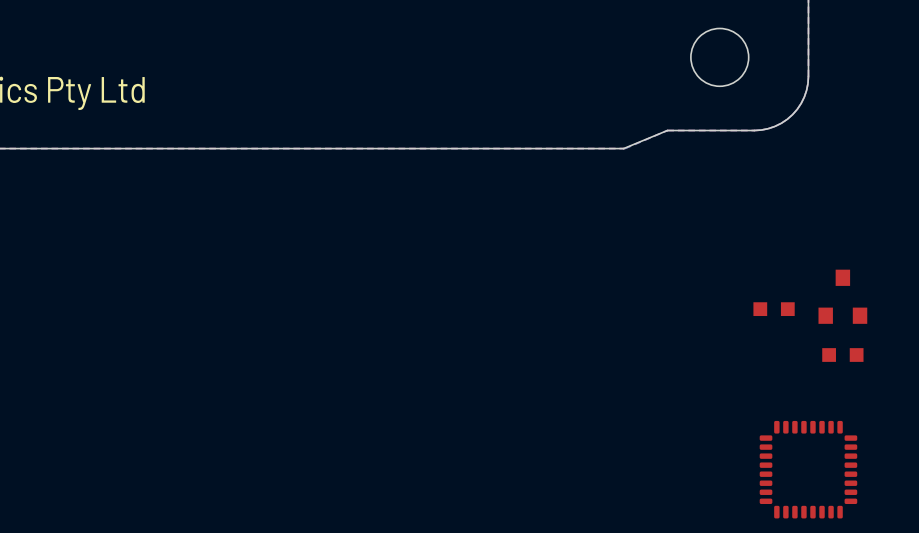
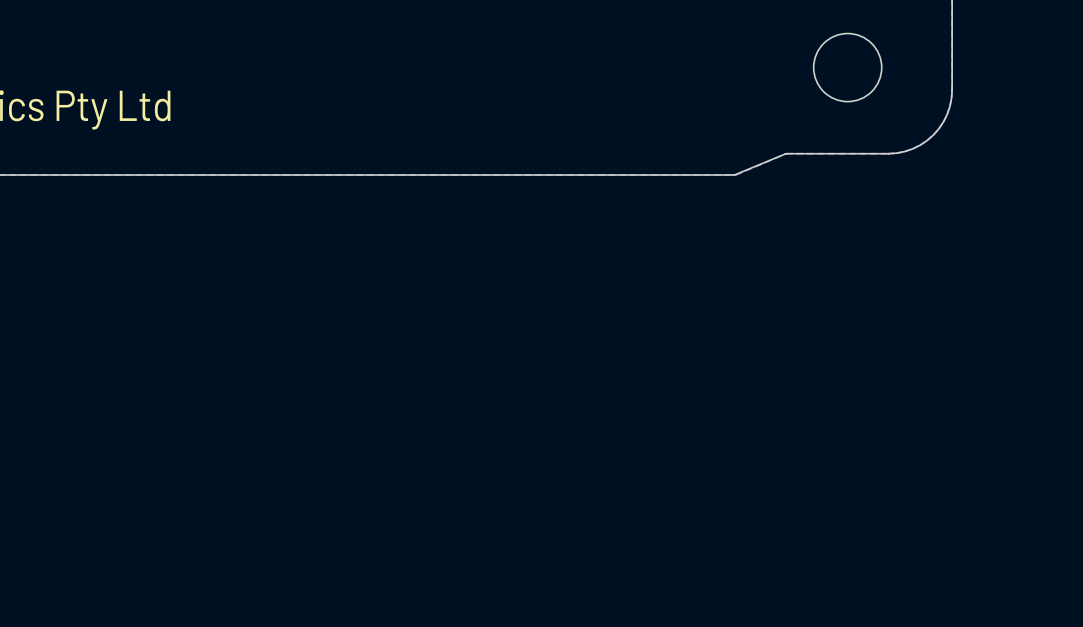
part: (842, 296) -> none
part: (774, 309) -> none
part: (842, 355) -> none
part: (808, 469) -> none

